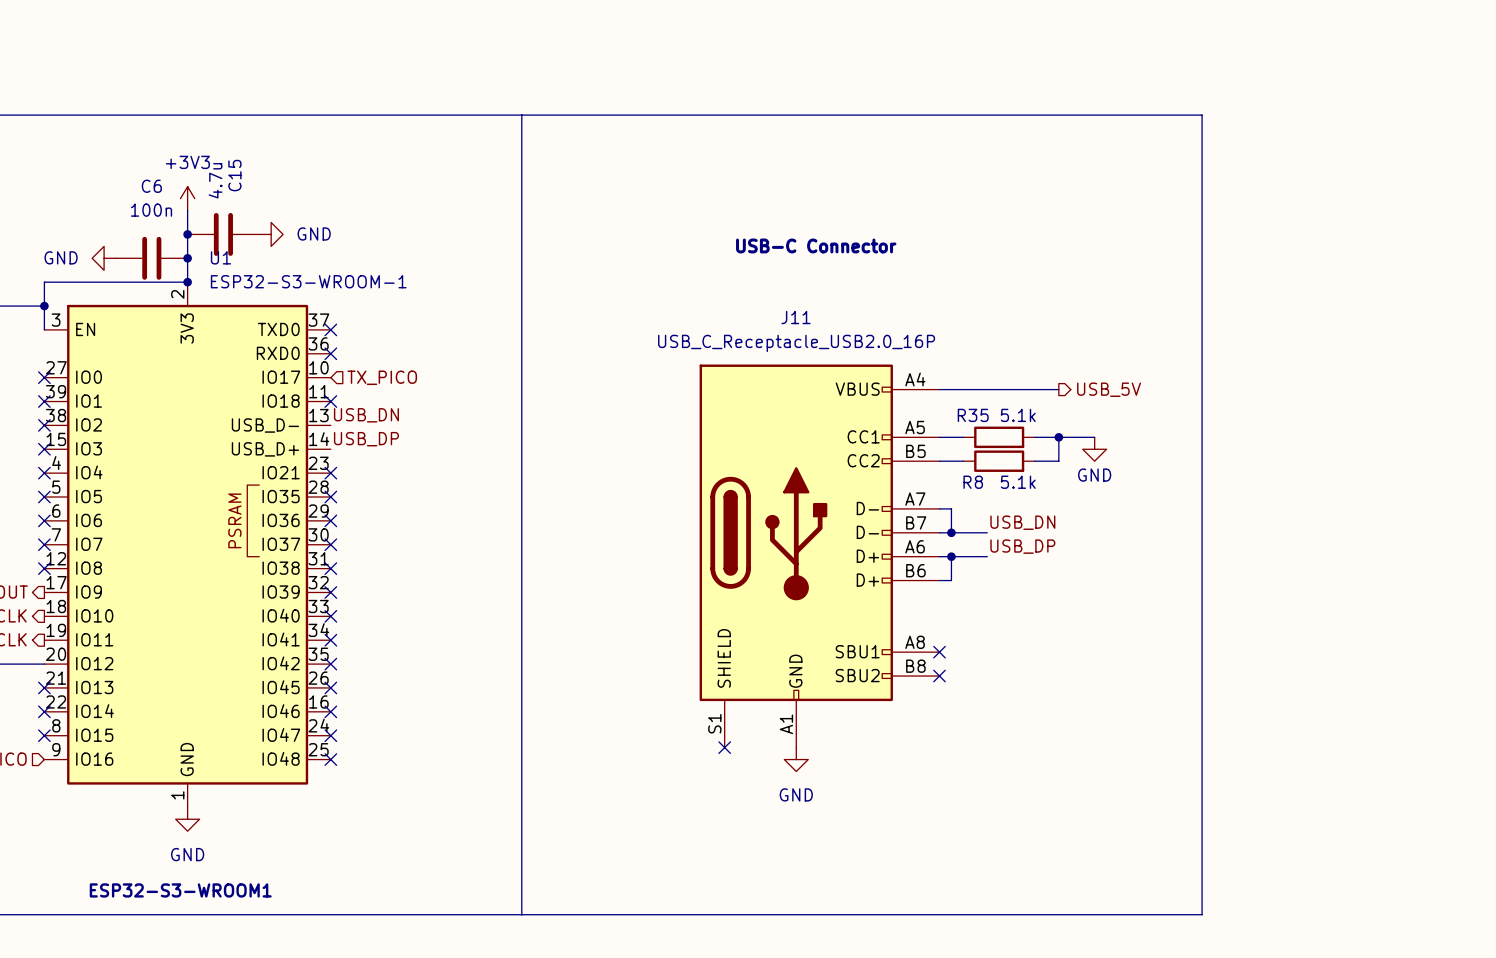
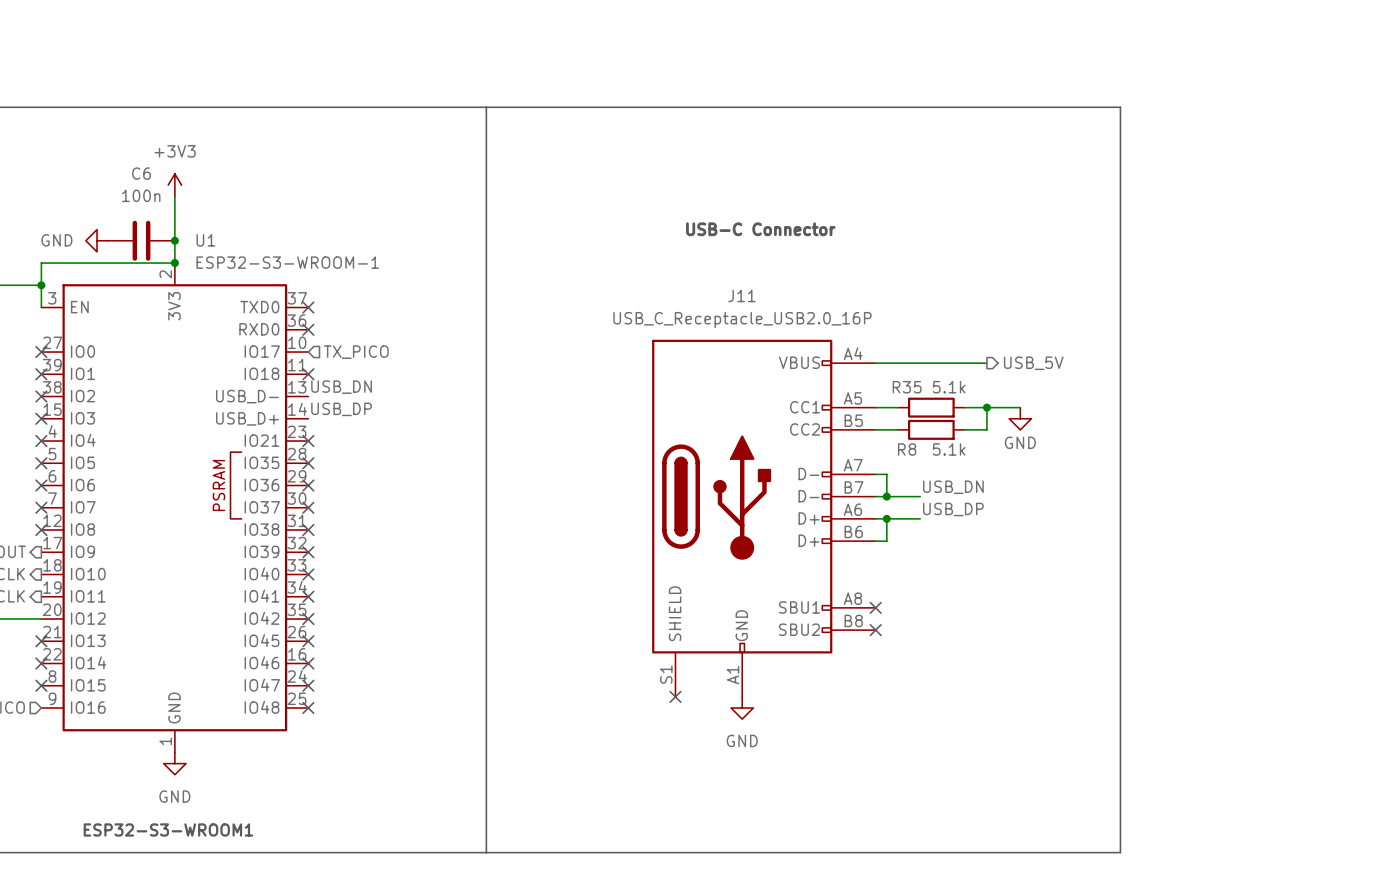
junction: (187, 234) -> none
C15: 4.7u (223, 234) -> none
power symbol: GND (271, 234) -> none

